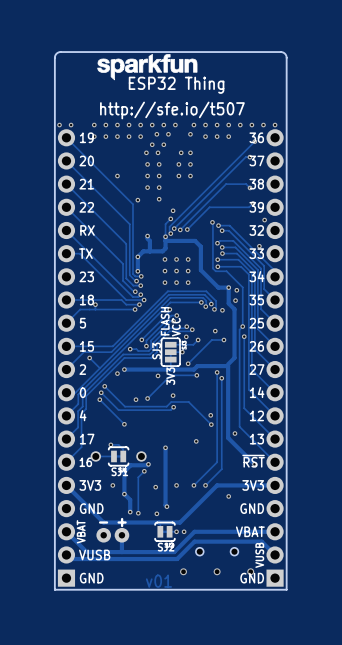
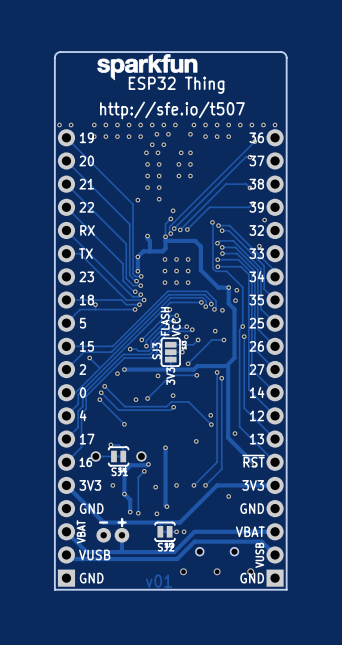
via: (117, 176) -> none

